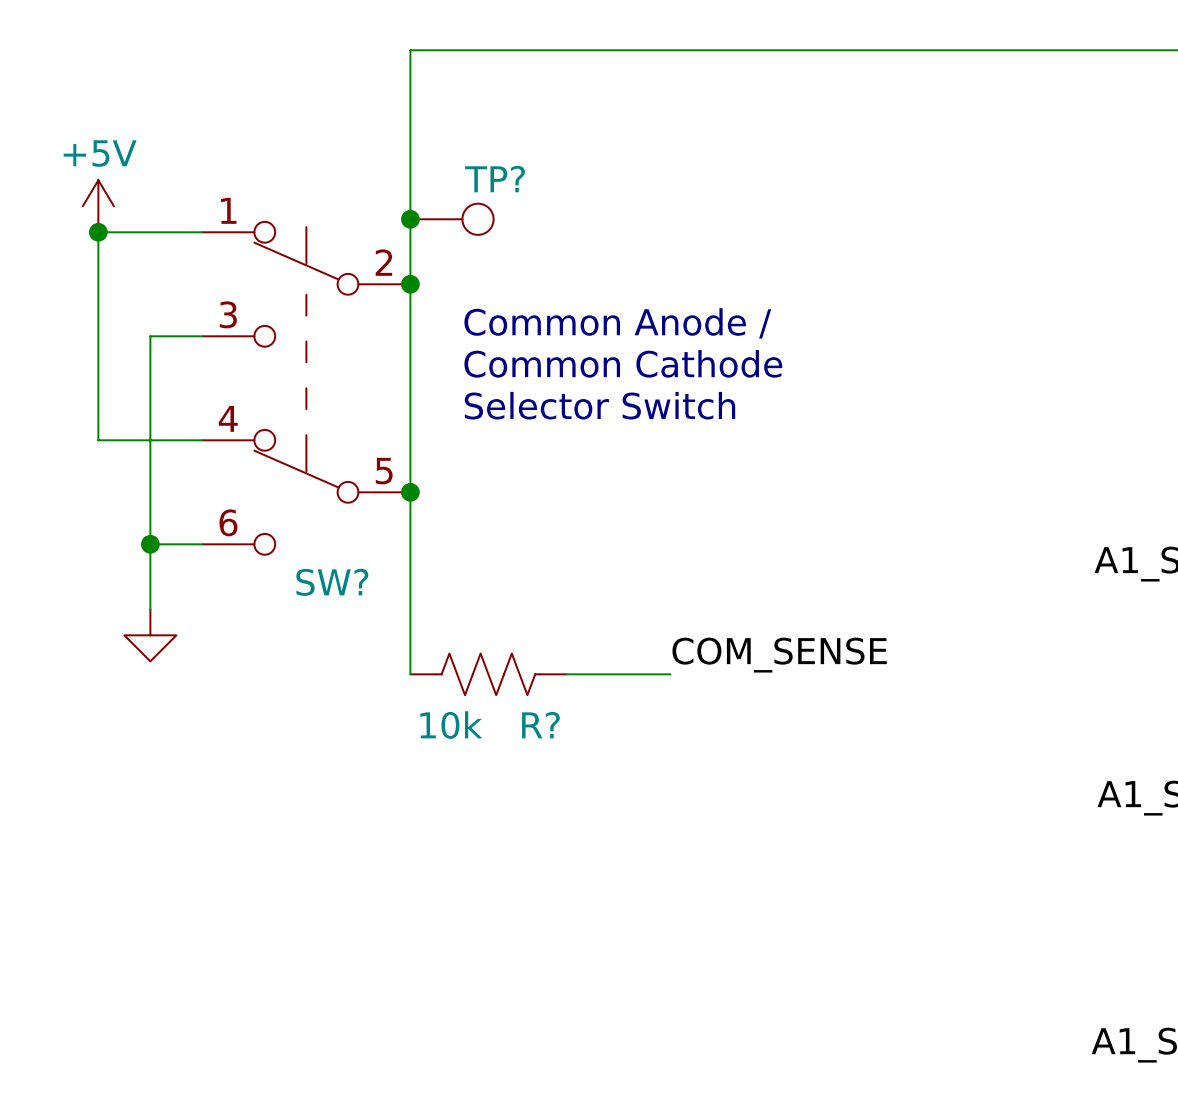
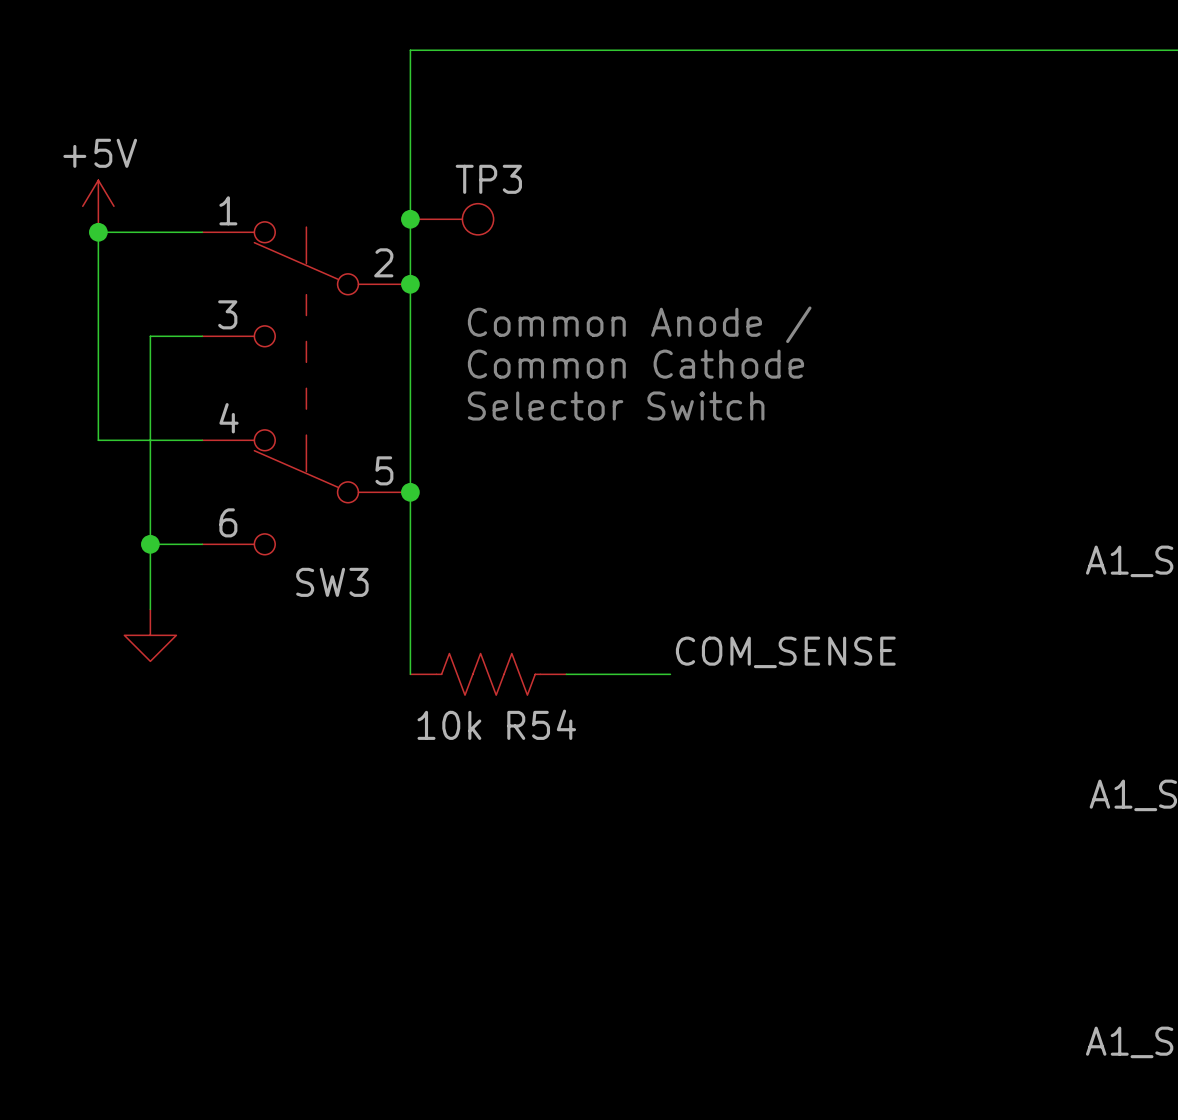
TP? name: TP? (495, 179) -> TP3 (488, 179)
SW? name: SW? (332, 582) -> SW3 (332, 582)
R? name: R? (540, 725) -> R54 (541, 724)

